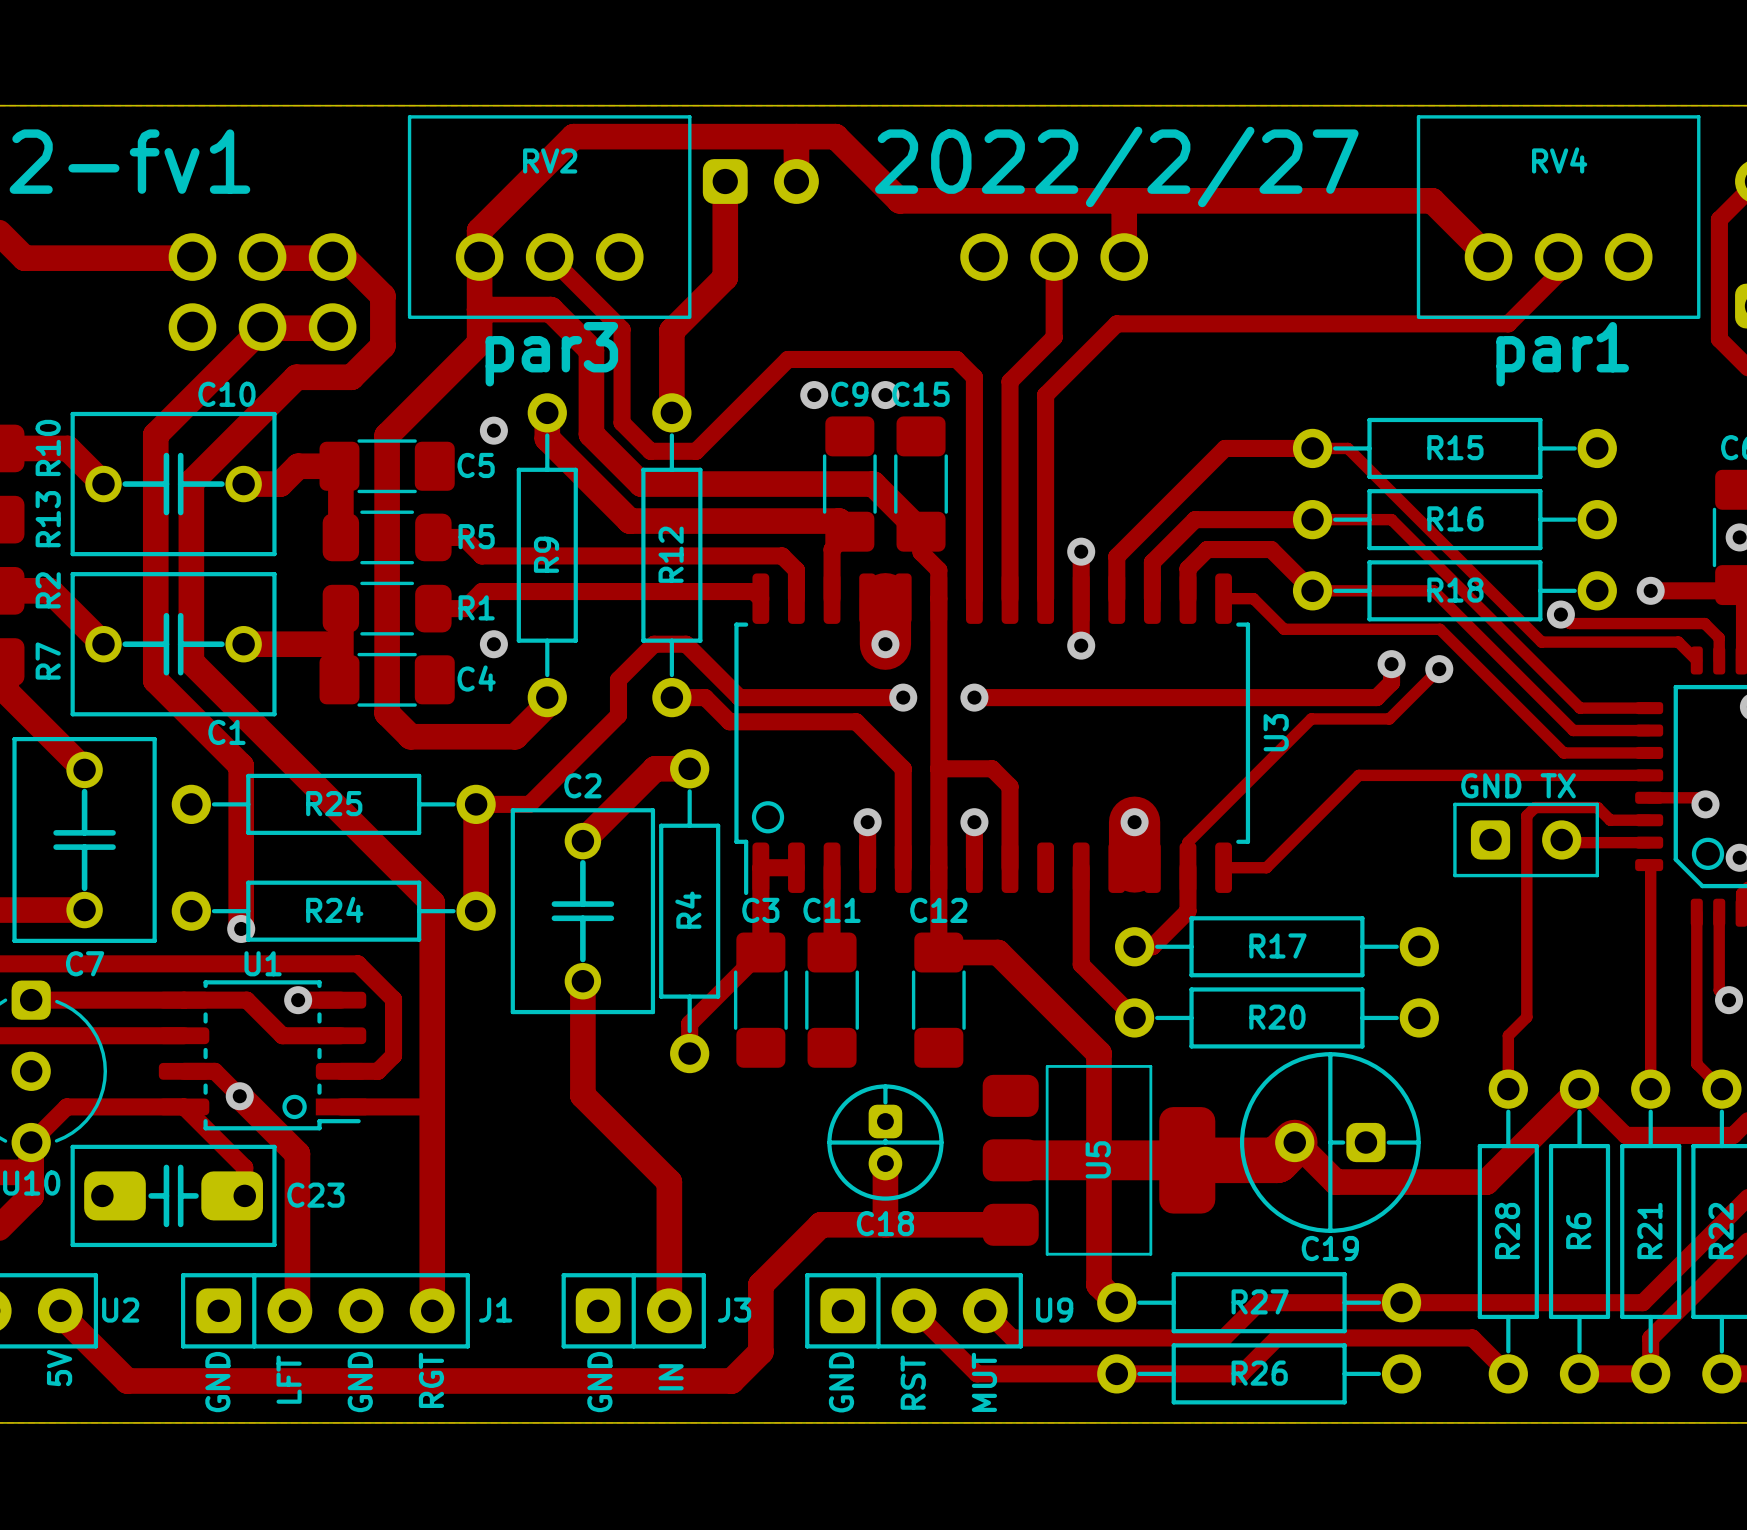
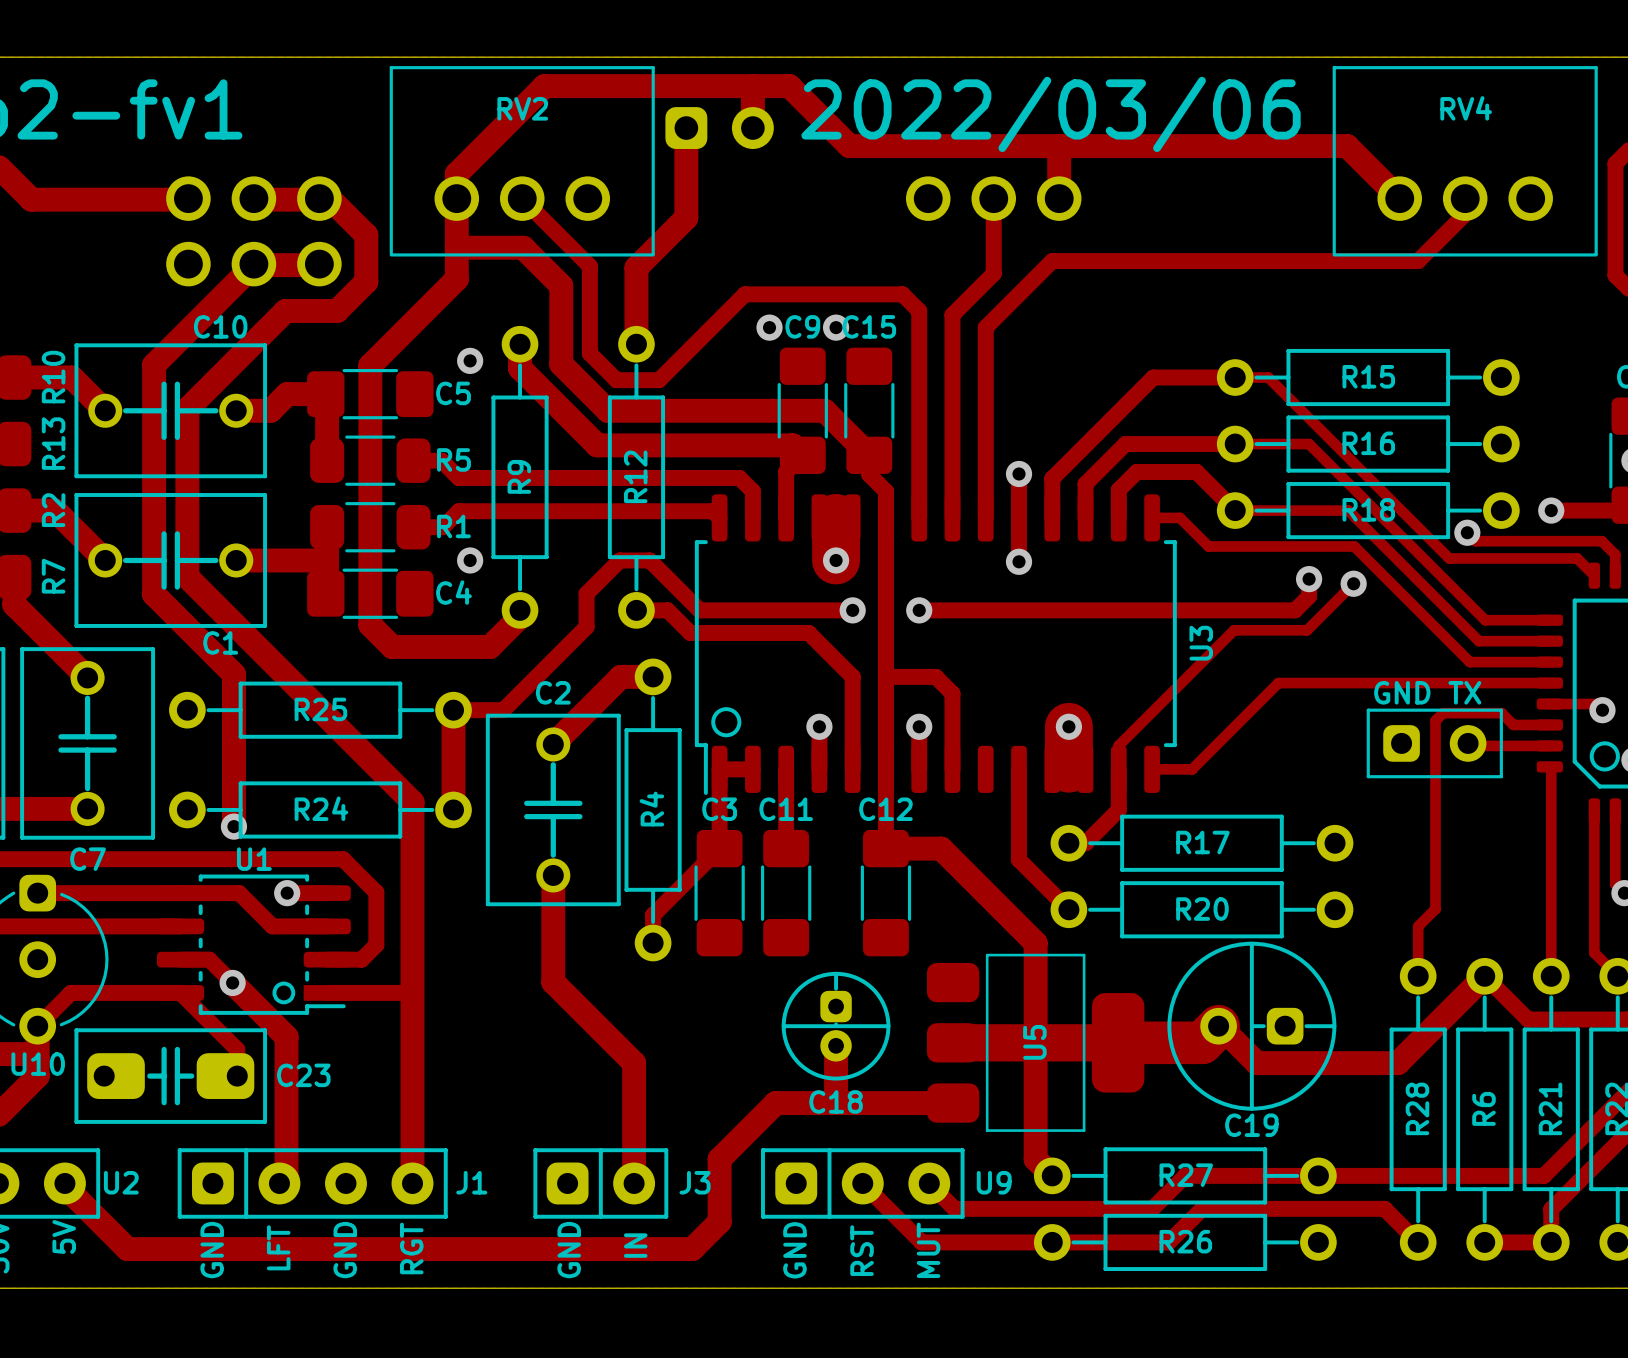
text: 2022/2/27 (1116, 166) -> 2022/03/06 (1051, 114)
text: par3 (551, 354) -> none
text: par1 (1562, 354) -> none

